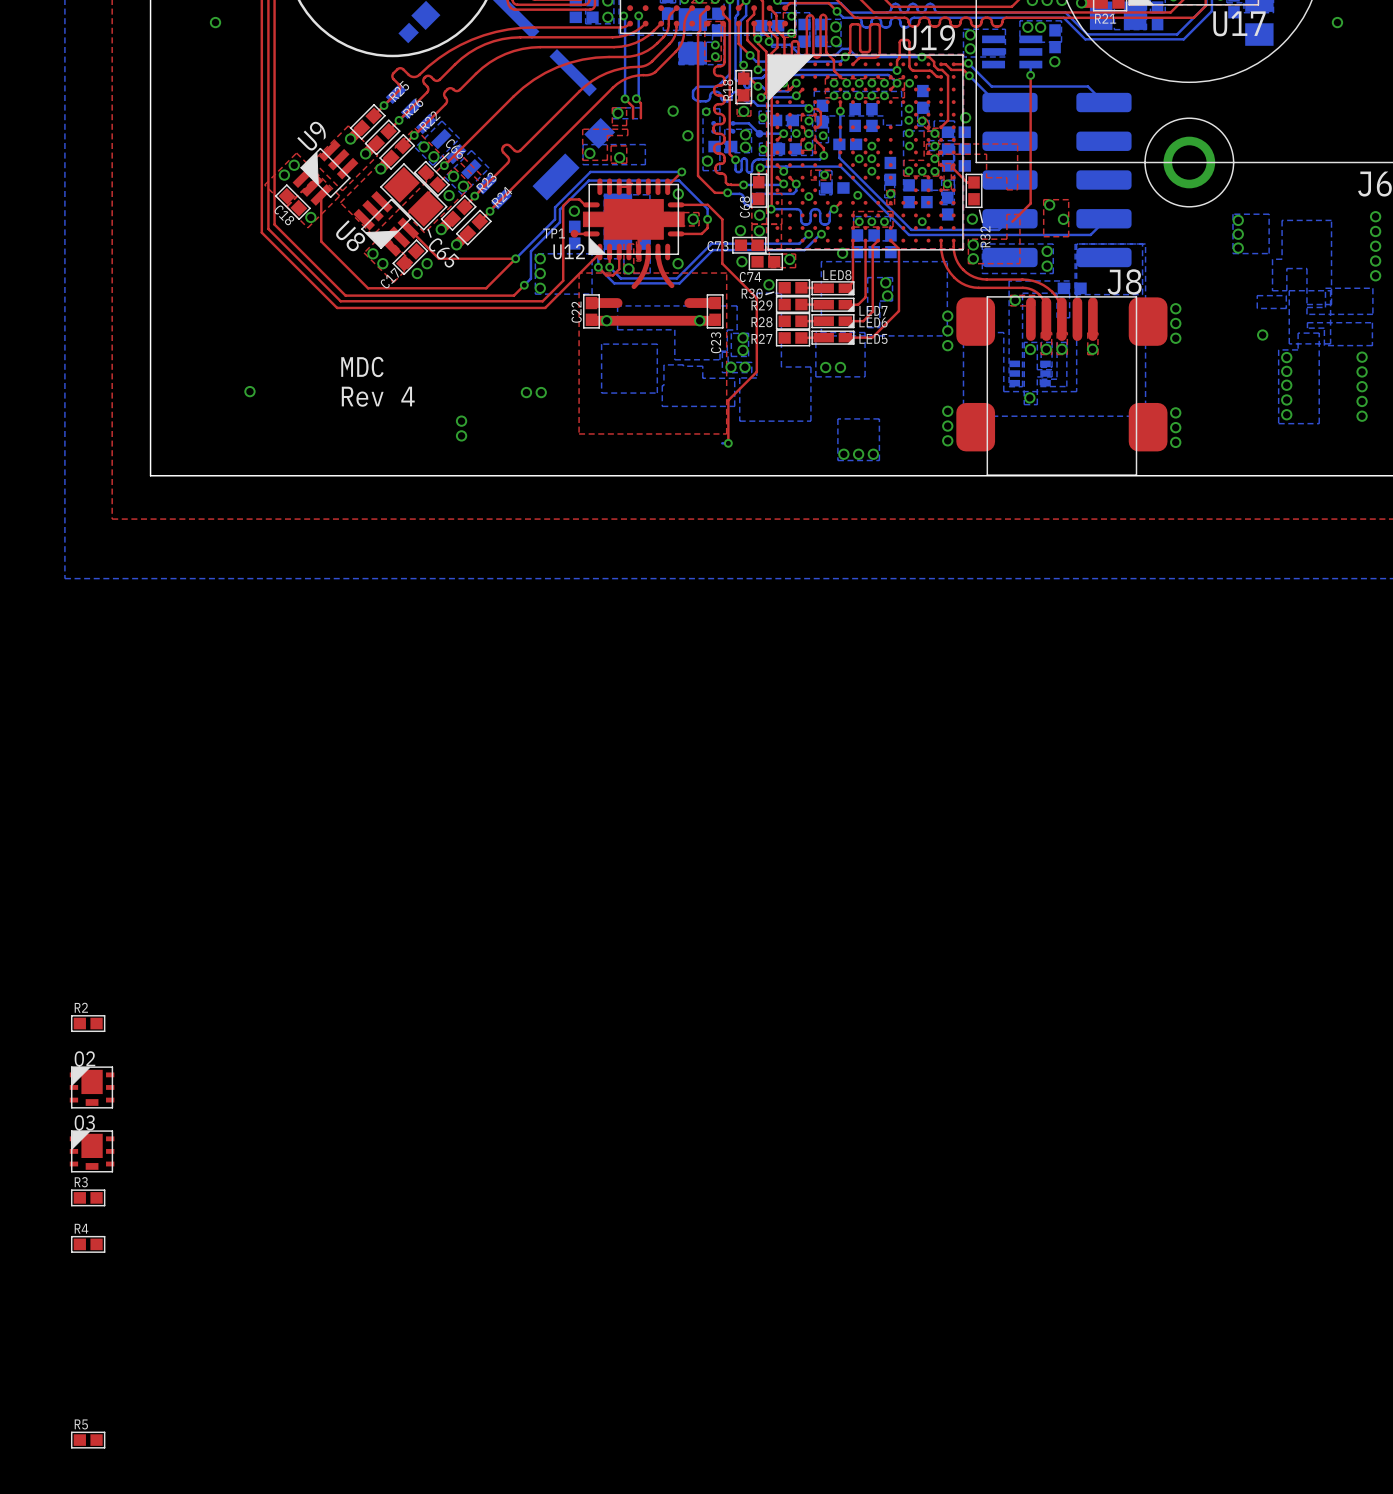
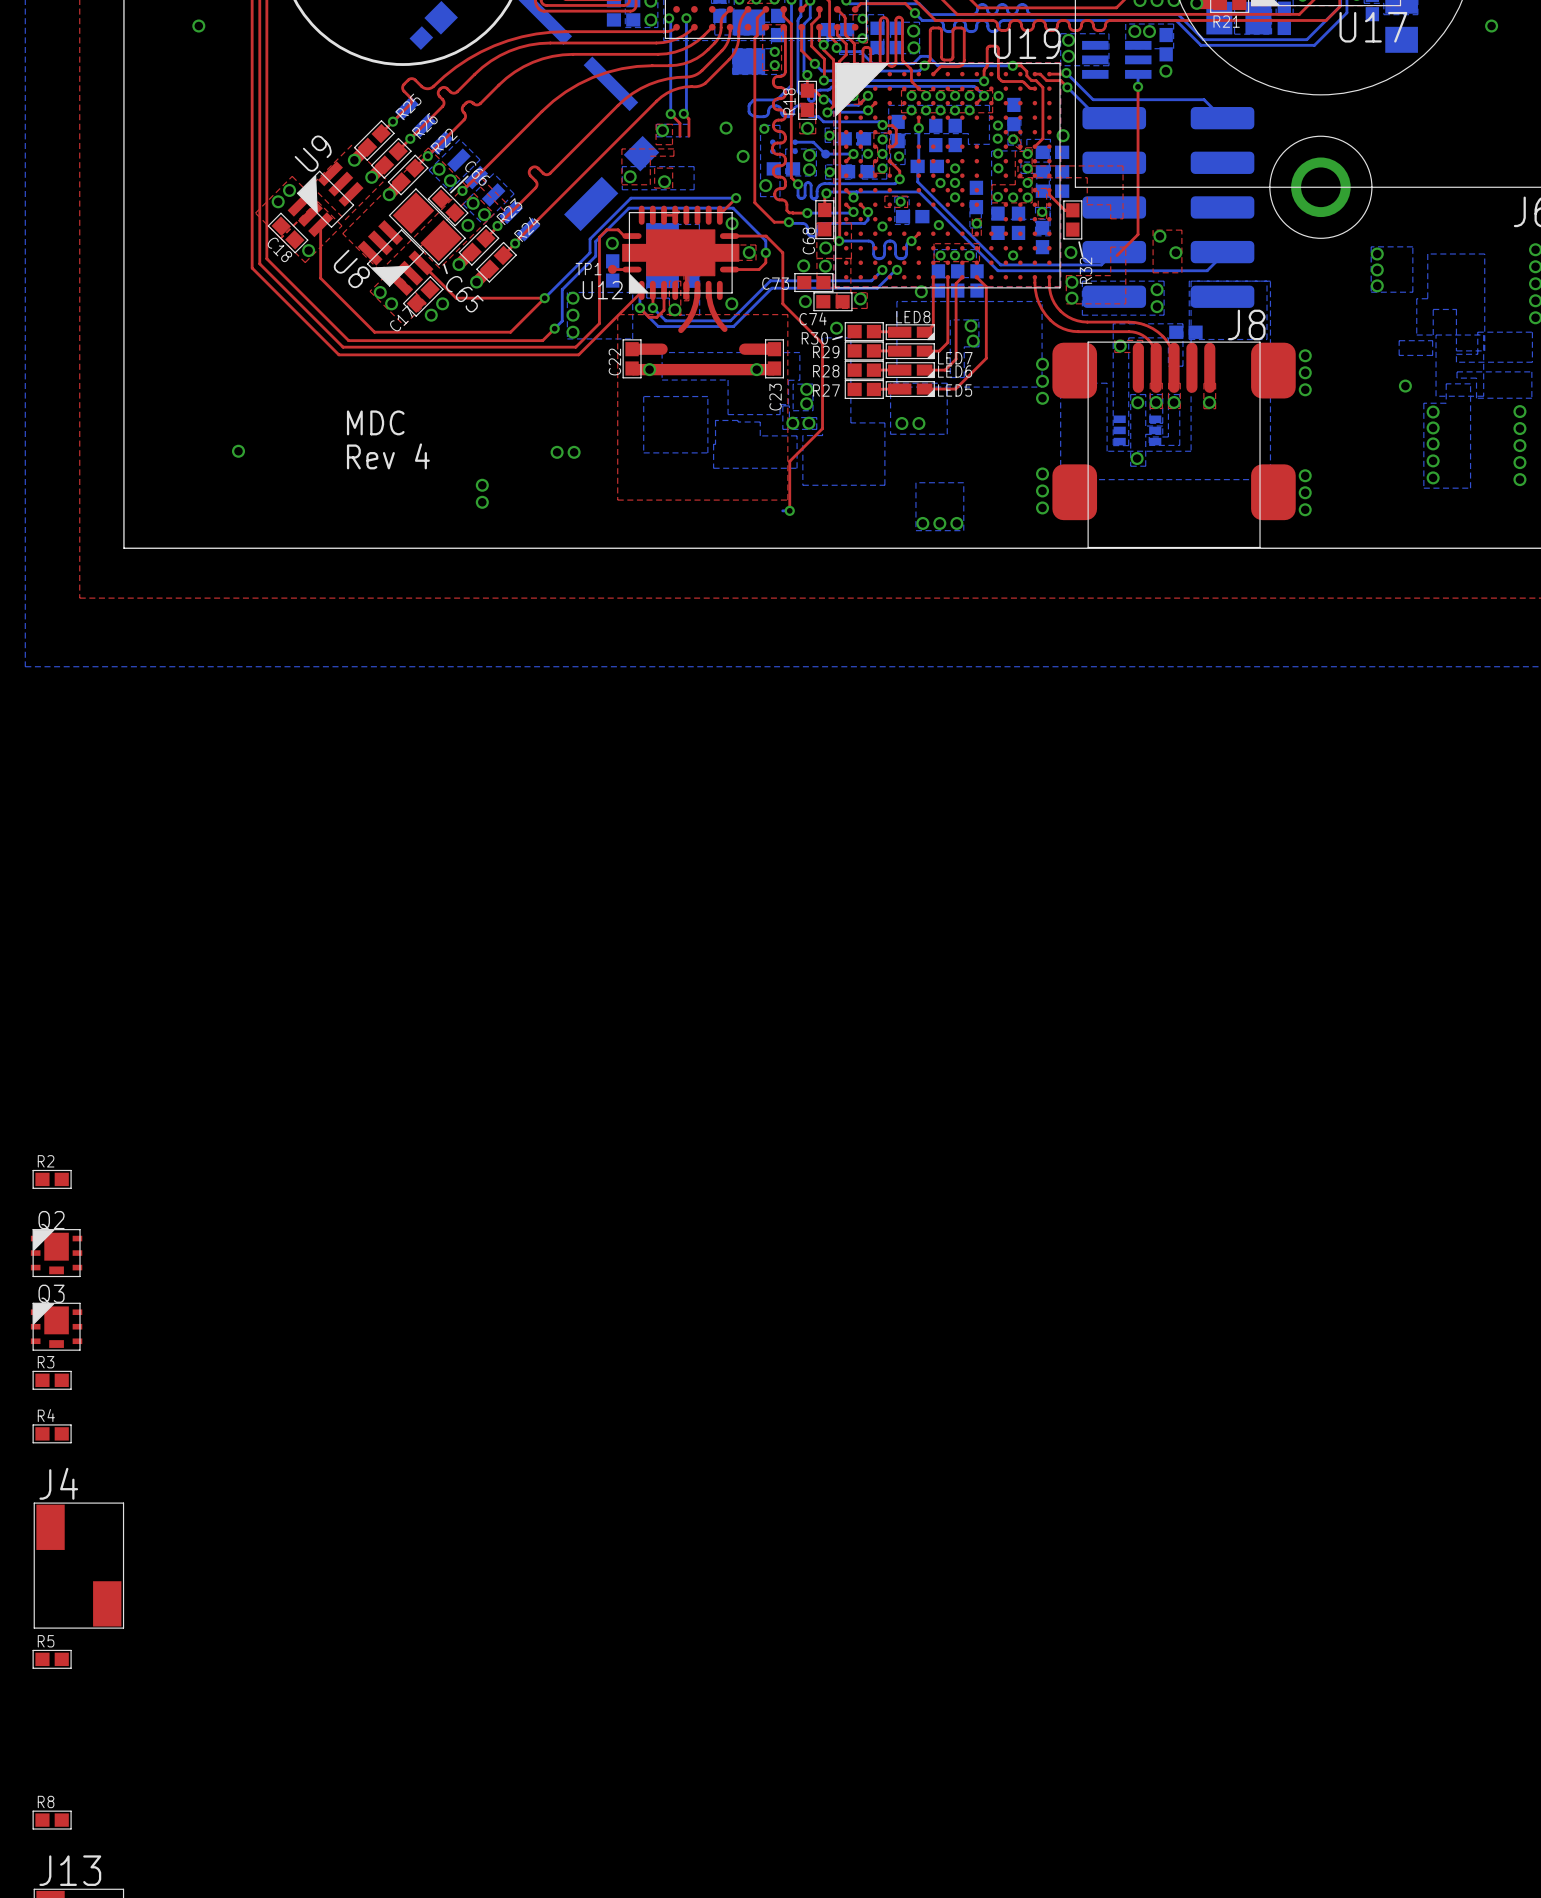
J4: none -> (78, 1565)

